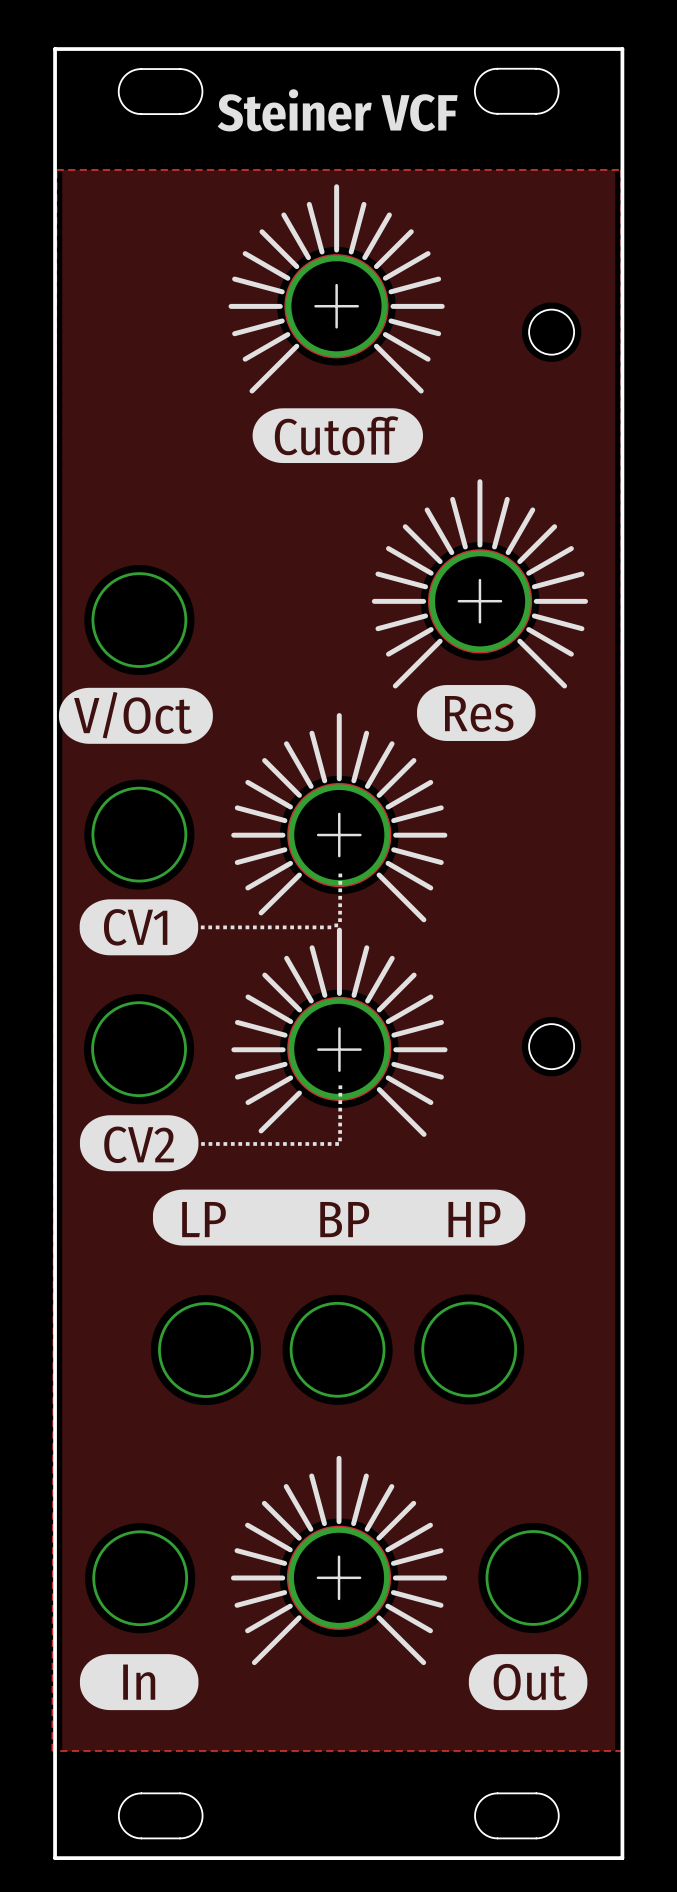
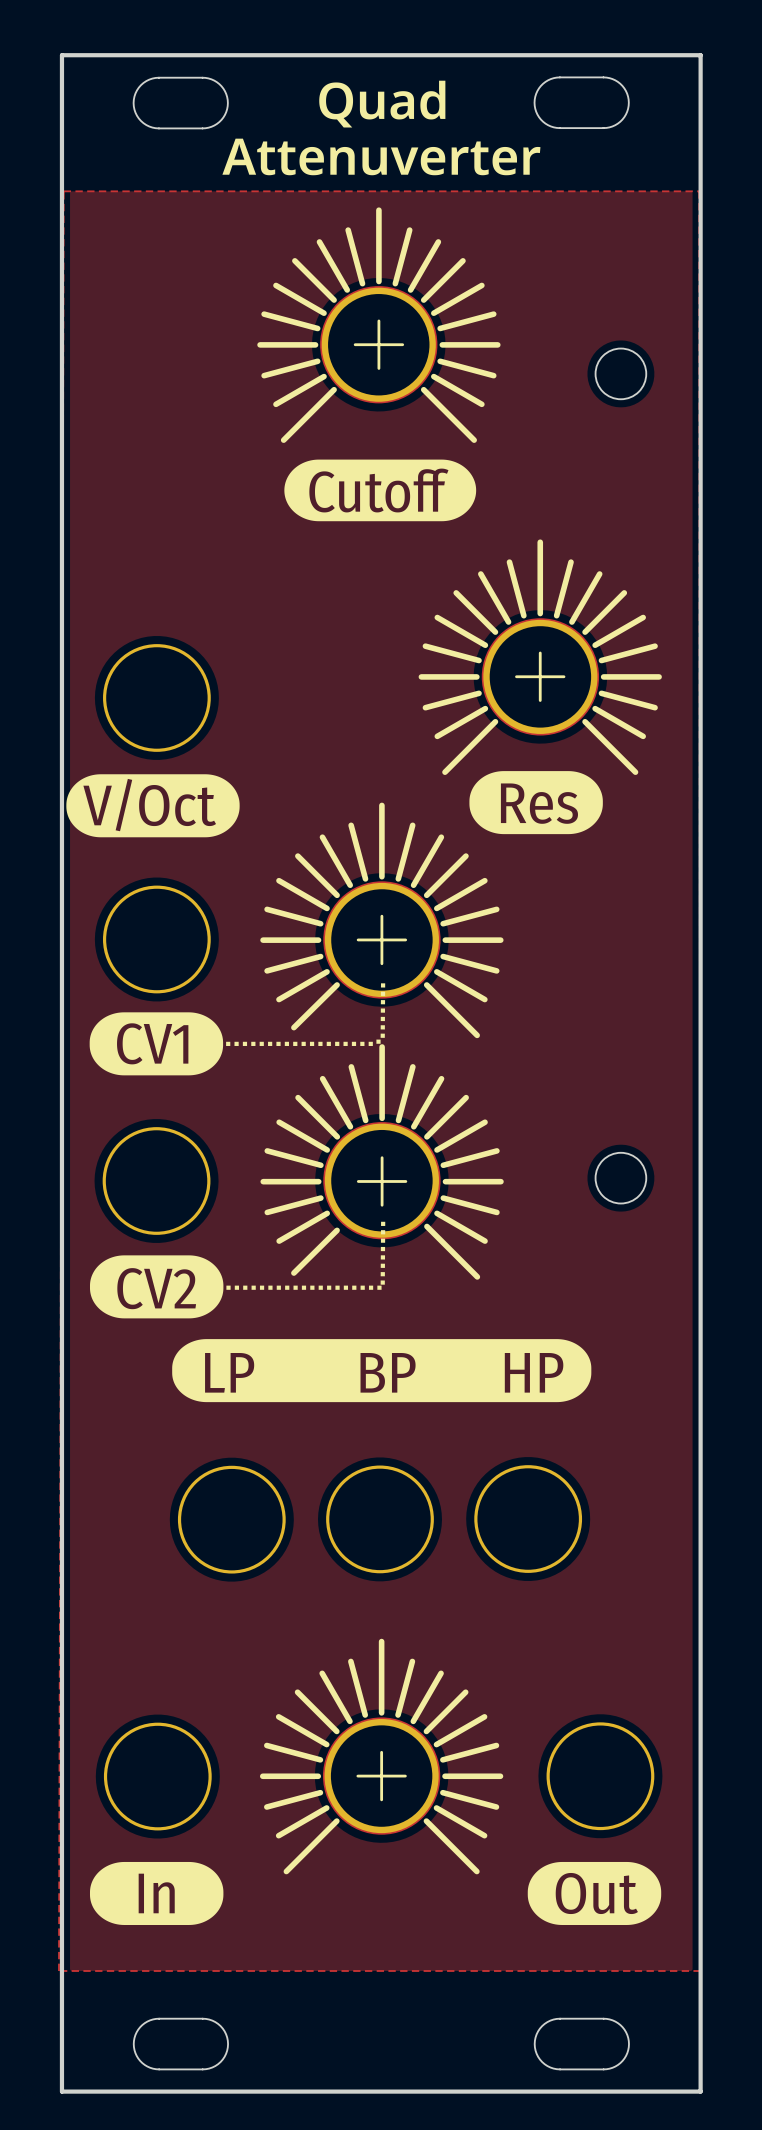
drawing: none -> [359, 80, 446, 120]
drawing shape: [288, 89, 299, 99] -> [319, 82, 354, 128]
drawing: [217, 94, 458, 132] -> none
drawing: none -> [222, 138, 541, 176]

